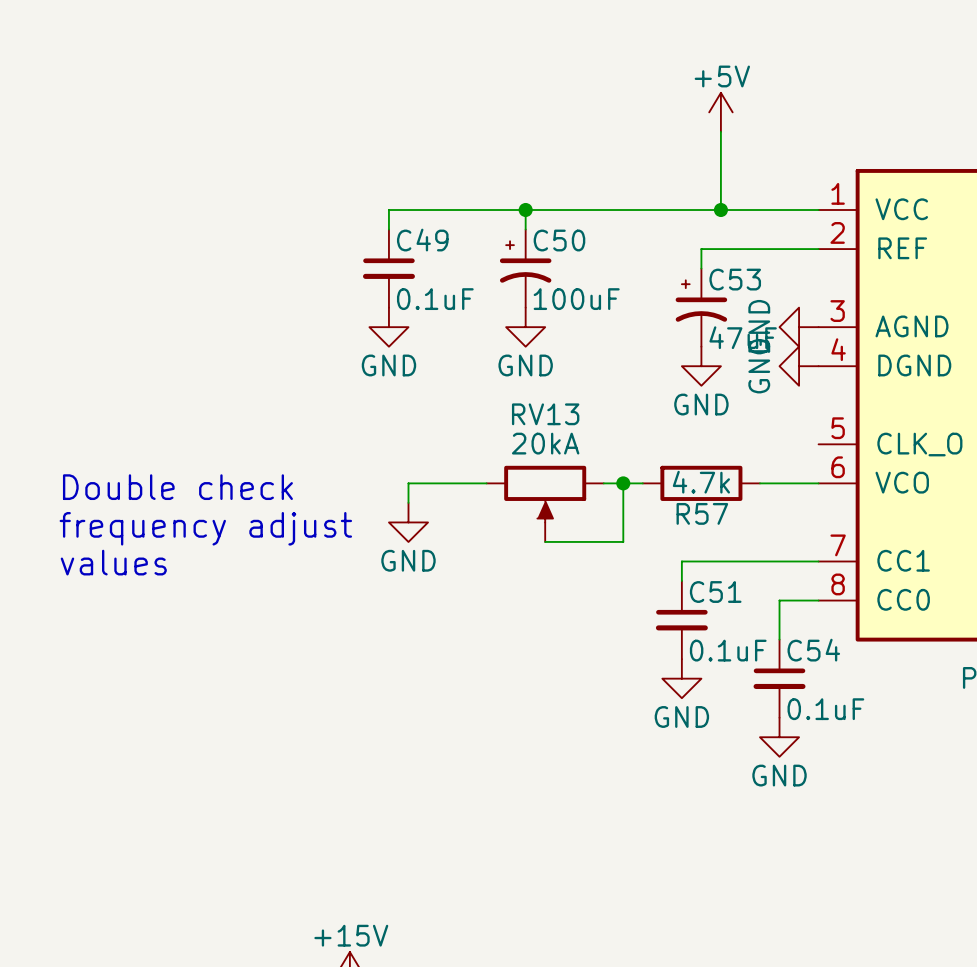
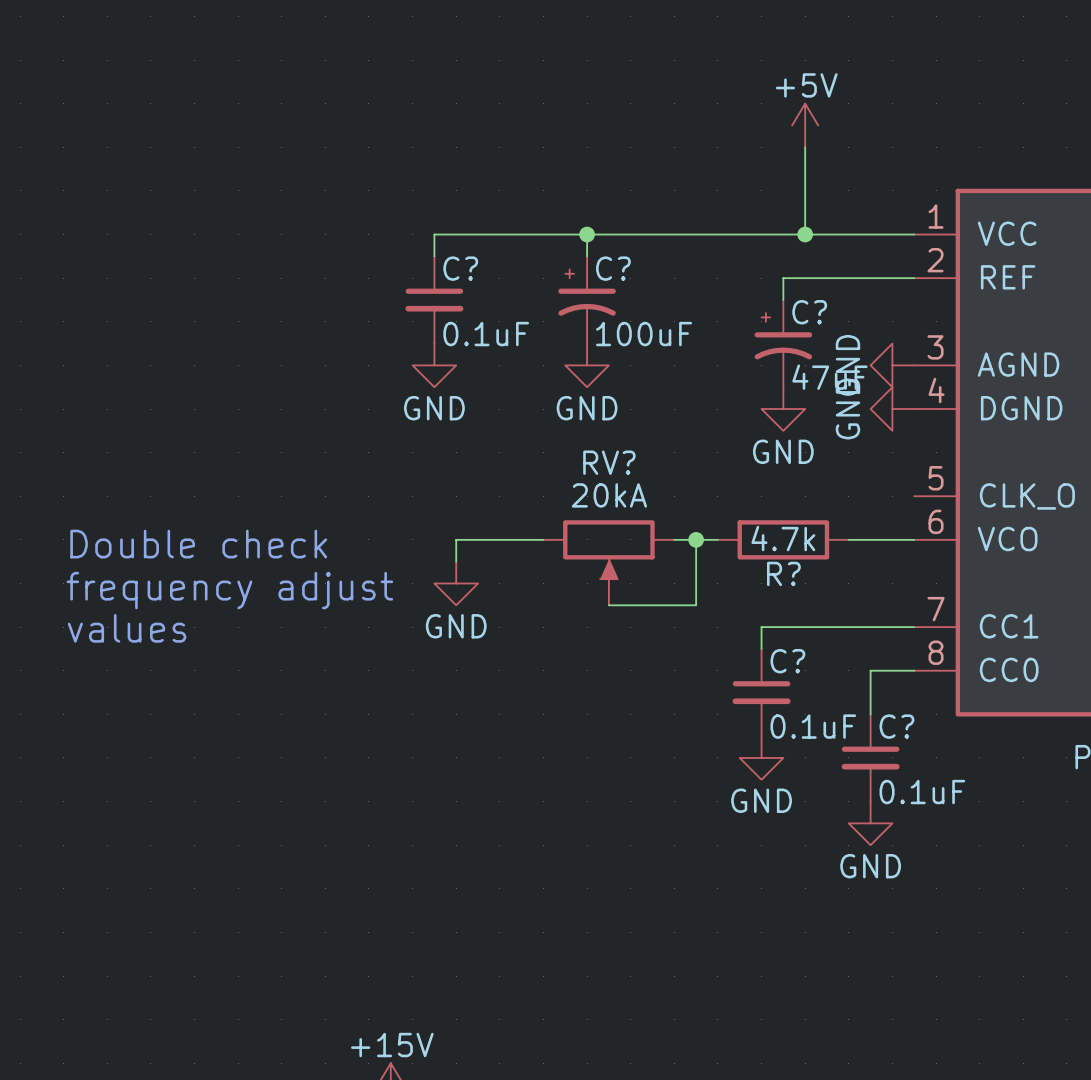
C49 name: C49 (422, 240) -> C? (460, 268)
C50 name: C50 (559, 240) -> C? (613, 268)
C53 name: C53 (735, 279) -> C? (809, 312)
RV13 name: RV13 (545, 414) -> RV? (609, 462)
R57 name: R57 (702, 513) -> R? (783, 573)
C51 name: C51 (715, 592) -> C? (787, 661)
C54 name: C54 (813, 650) -> C? (896, 726)

